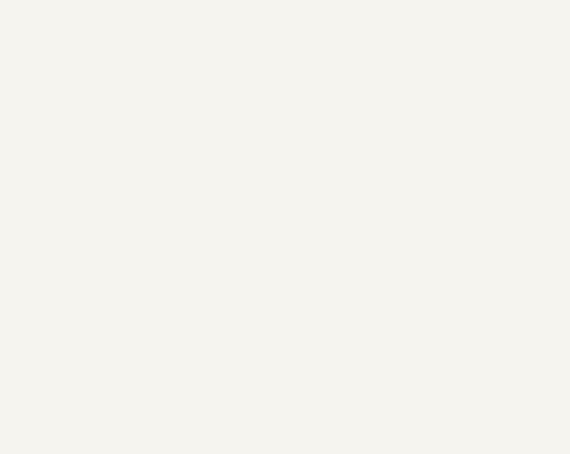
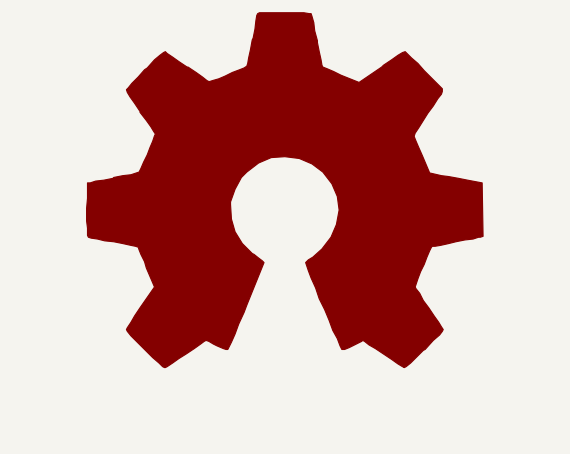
power symbol: none -> (284, 190)

